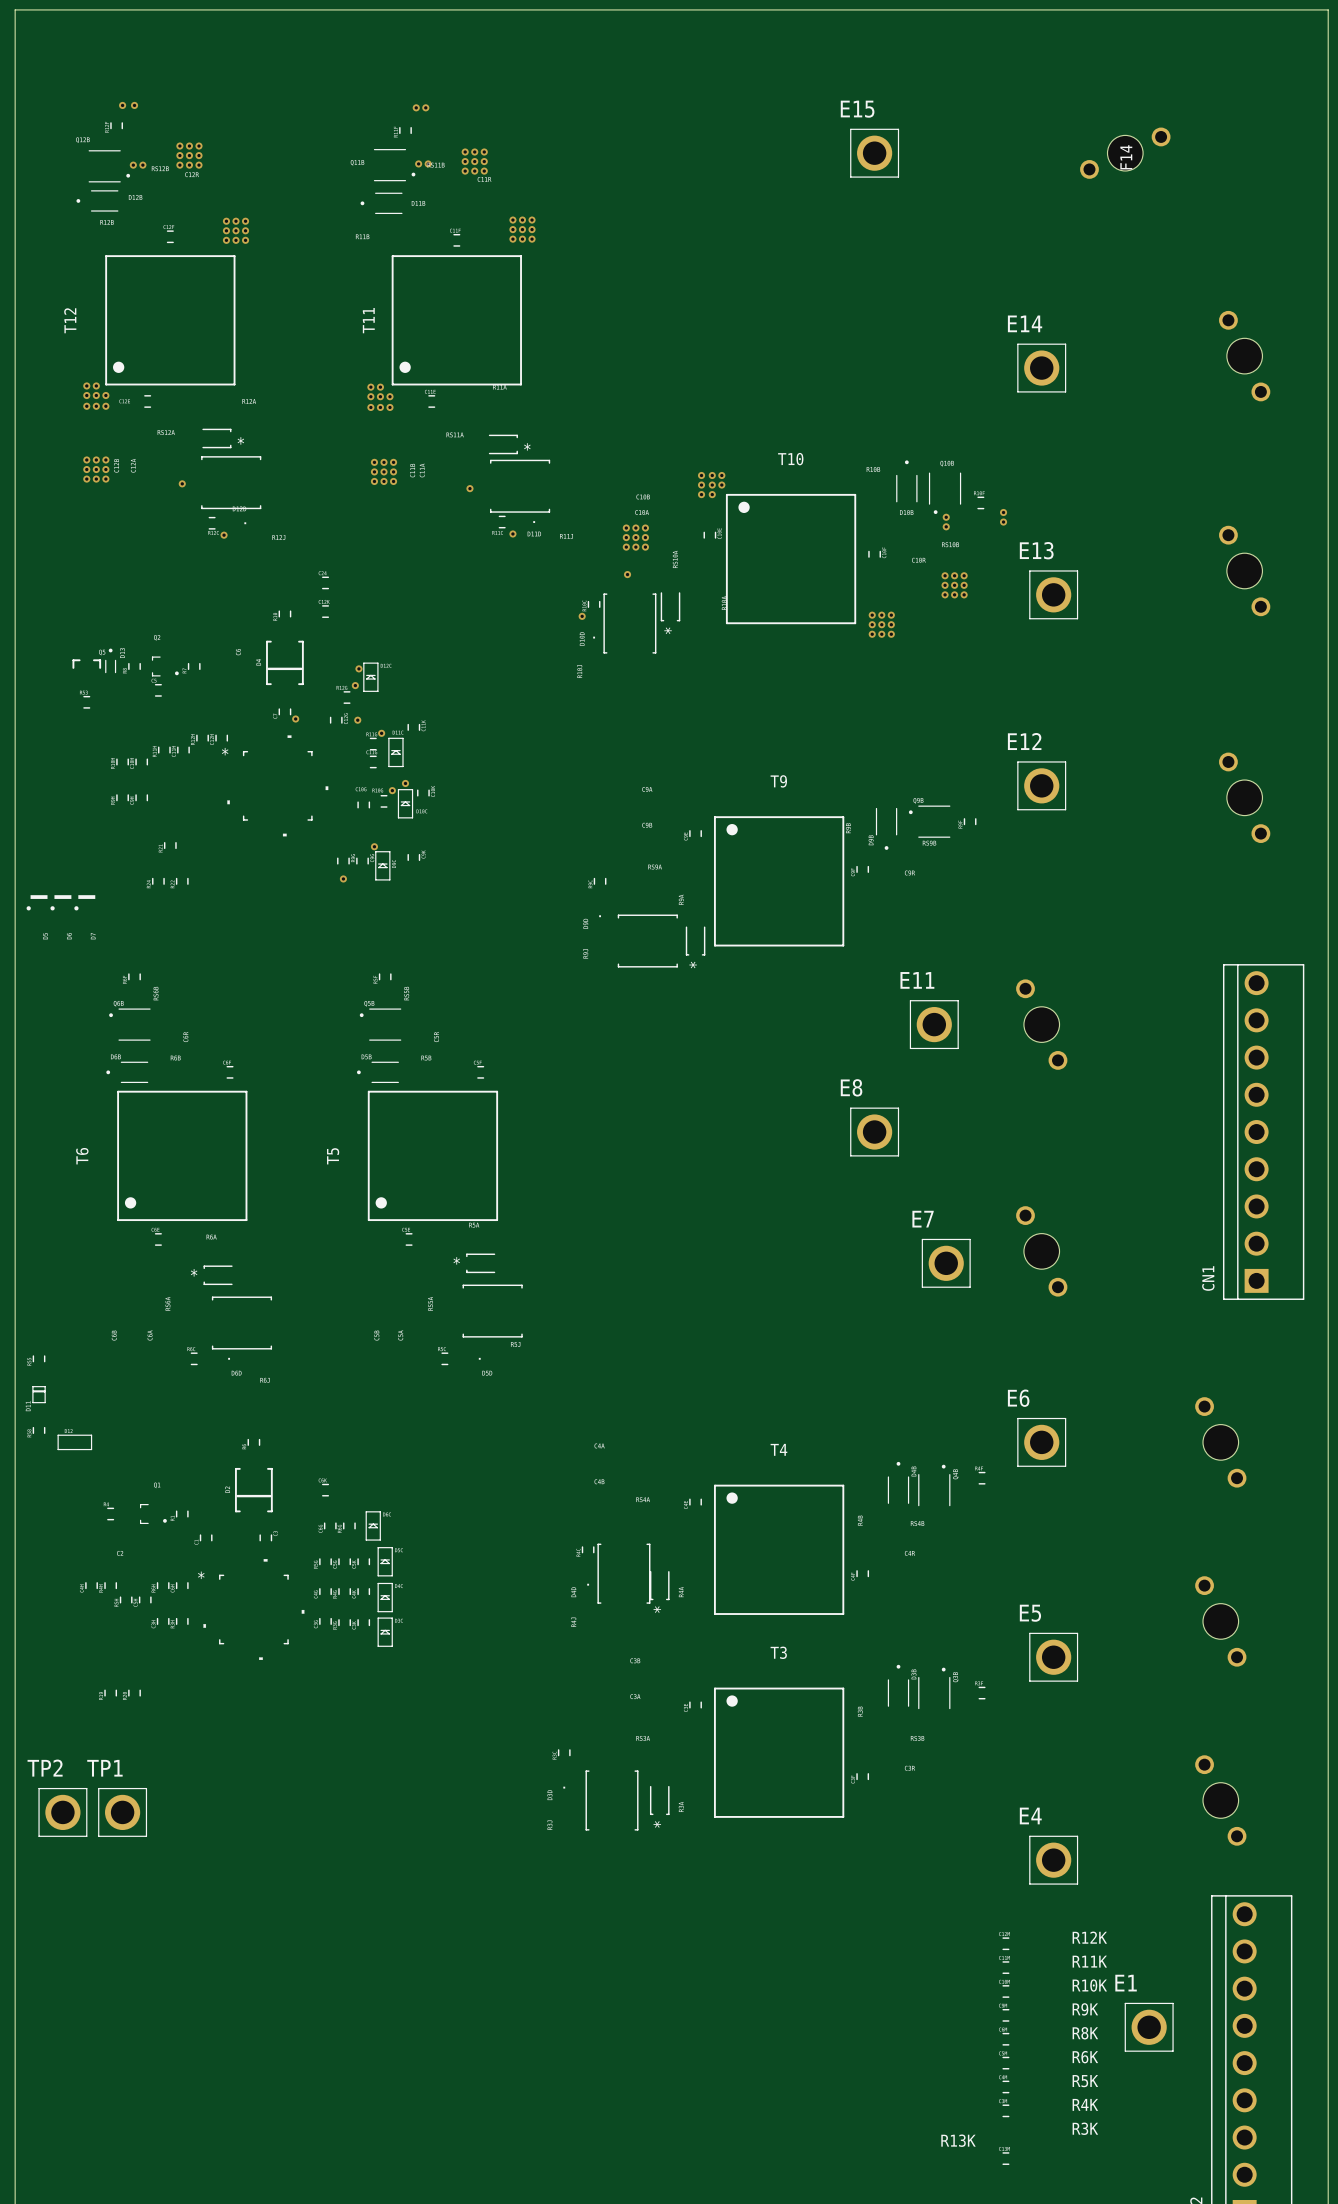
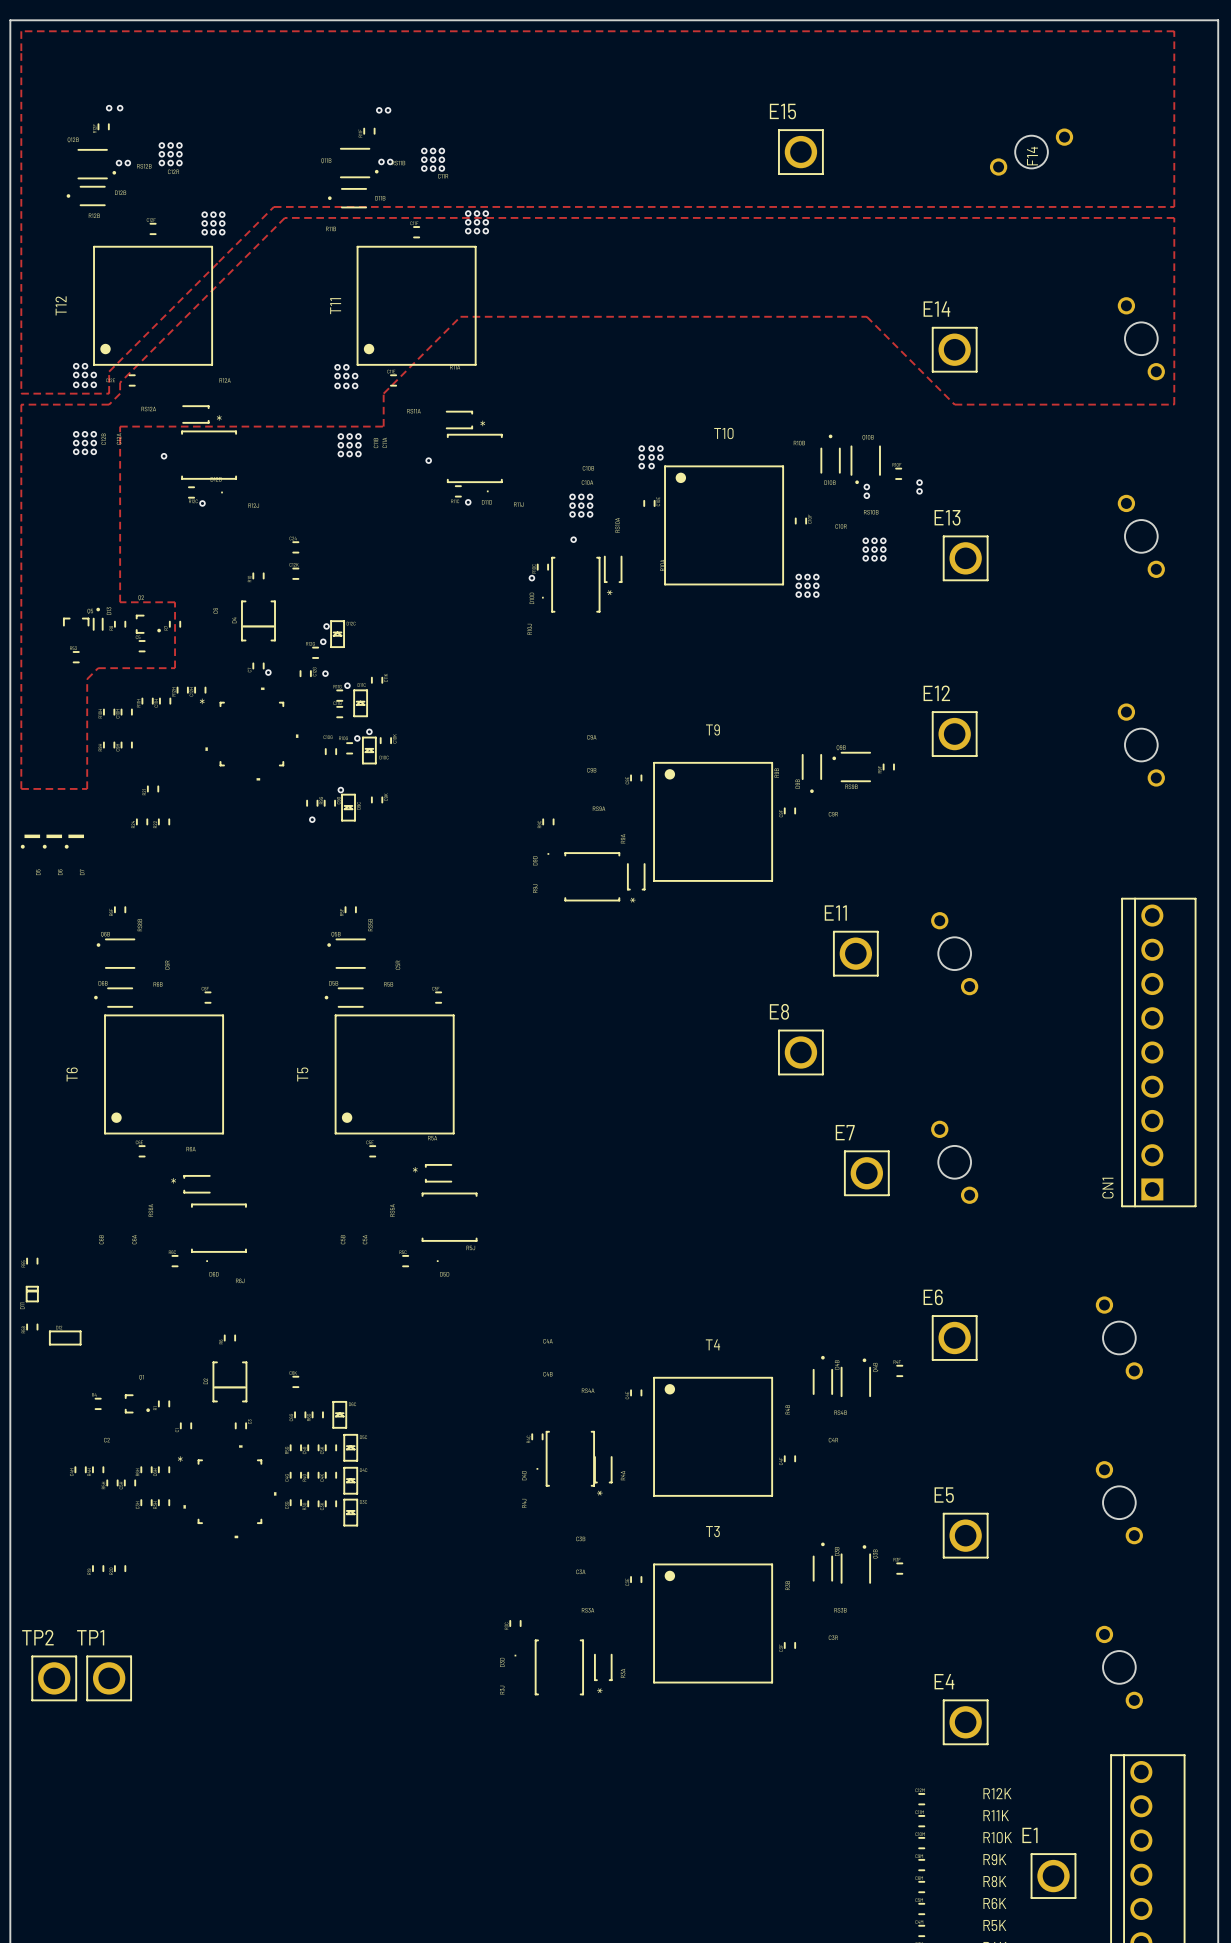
zone outline: none -> (21, 31) (21, 393) (109, 393) (109, 371) (273, 206) (1174, 206) (1174, 31) (21, 31)
zone outline: none -> (284, 217) (1174, 217) (1174, 404) (954, 404) (866, 316) (460, 316) (383, 393) (383, 426) (120, 426) (120, 602) (175, 602) (175, 668) (98, 668) (87, 679) (87, 788) (21, 788) (21, 404) (109, 404) (120, 393) (120, 382) (284, 217)

